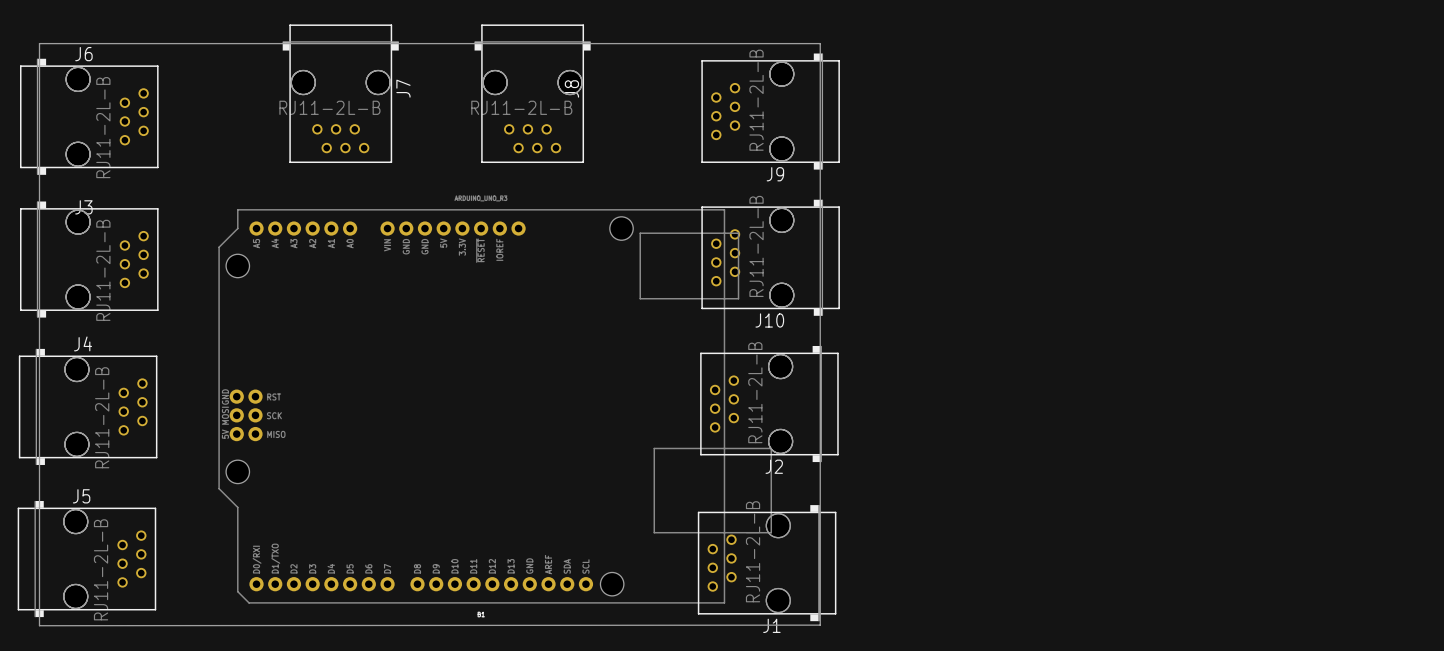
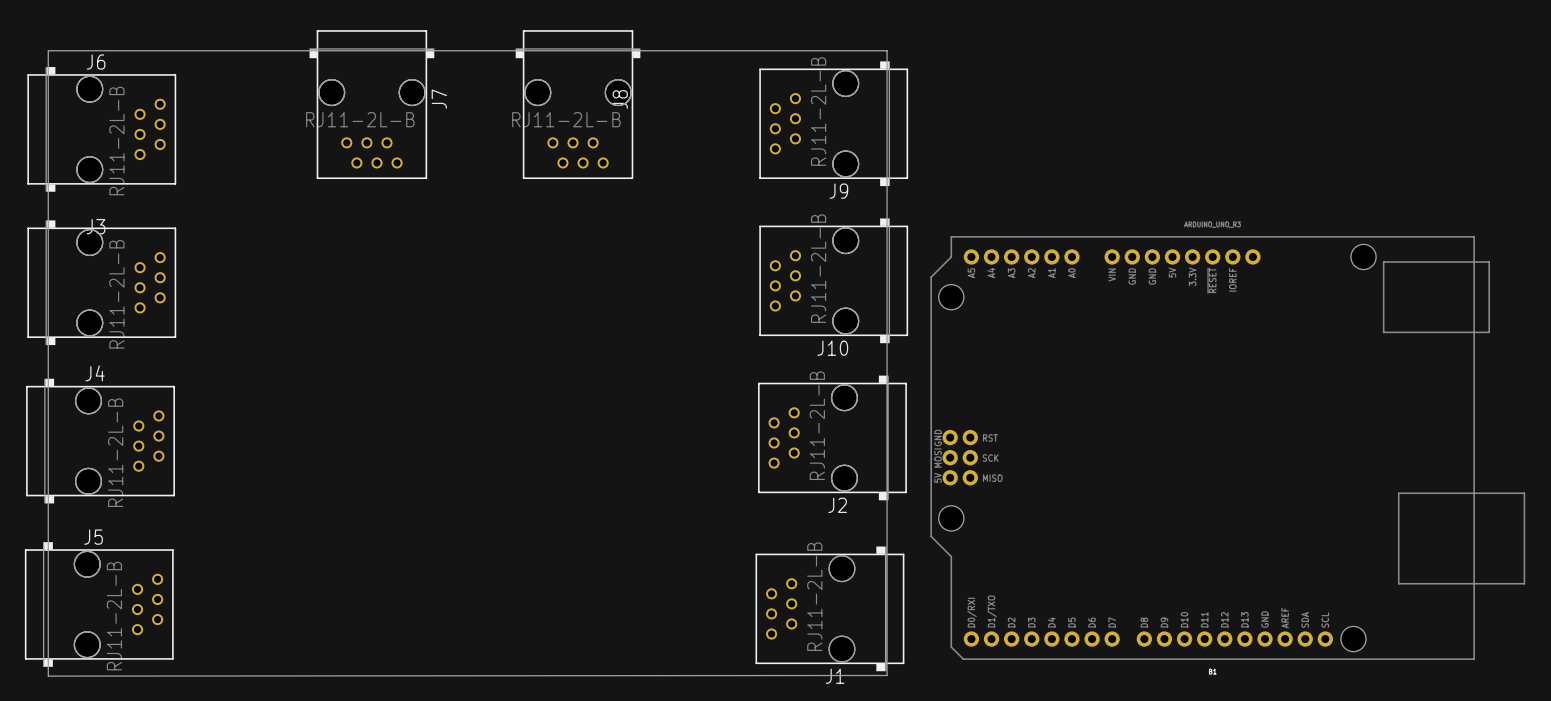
part position: (495, 406) -> (1227, 448)

